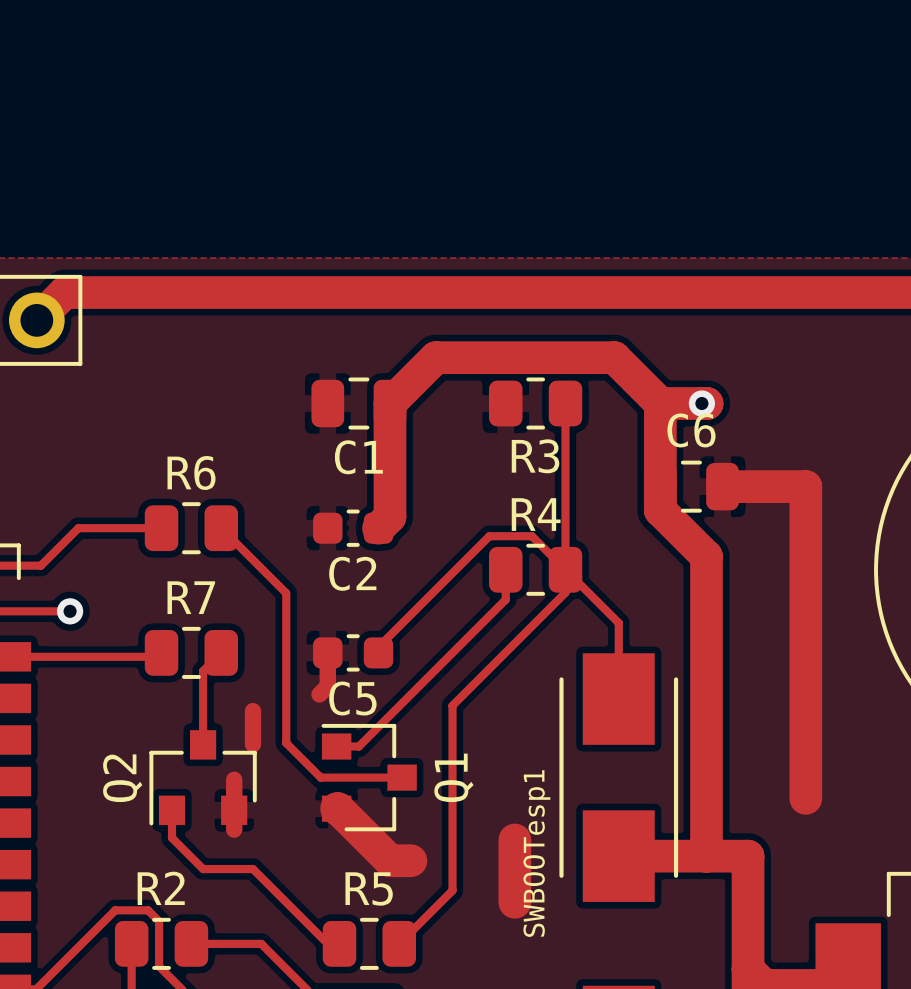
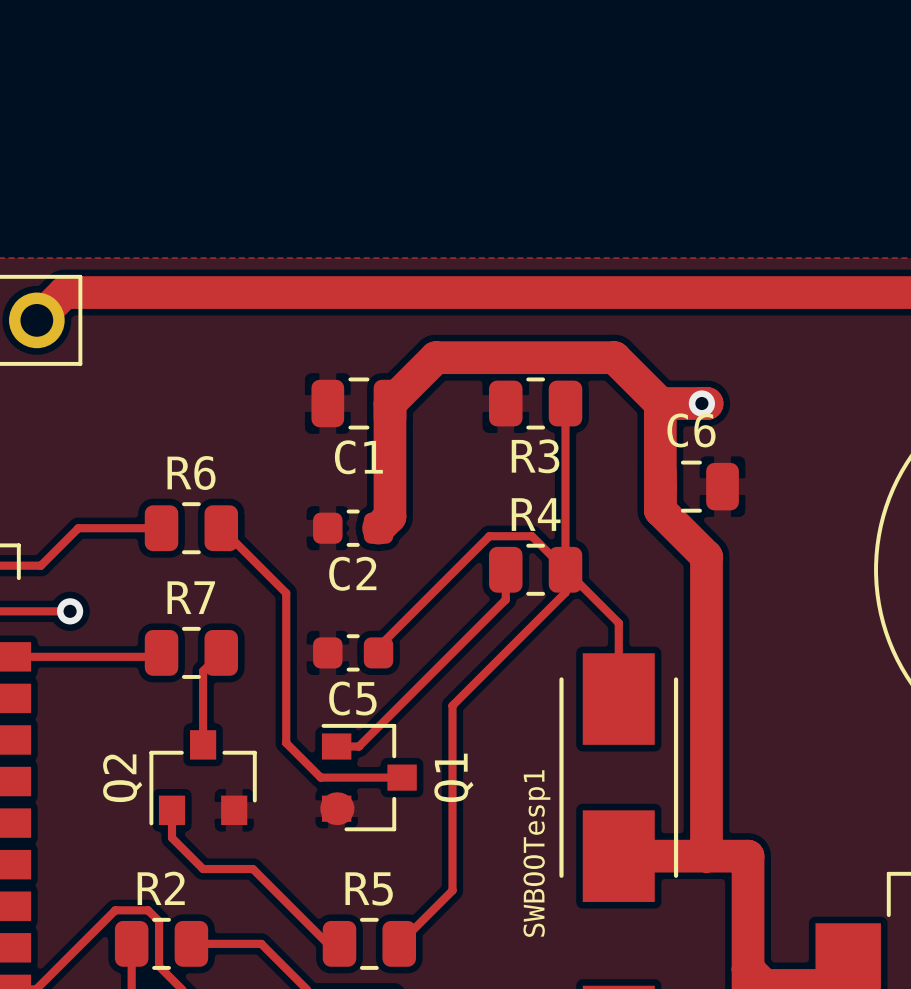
track: (722, 486) (805, 486) (805, 798) -> none
track: (327, 652) (327, 686) (319, 694) -> none
track: (252, 711) (252, 744) -> none
track: (234, 779) (234, 829) -> none
track: (338, 808) (390, 860) (410, 860) -> none
track: (514, 839) (514, 902) -> none

